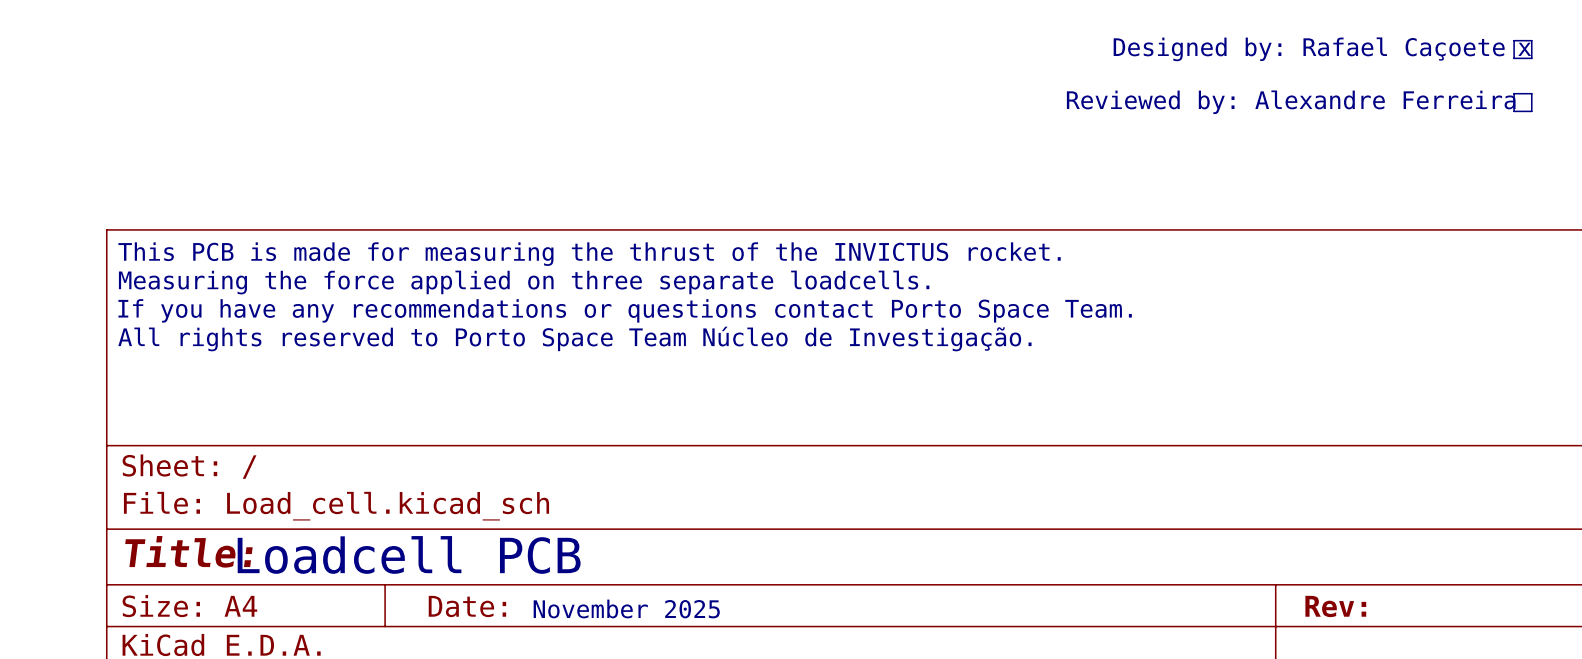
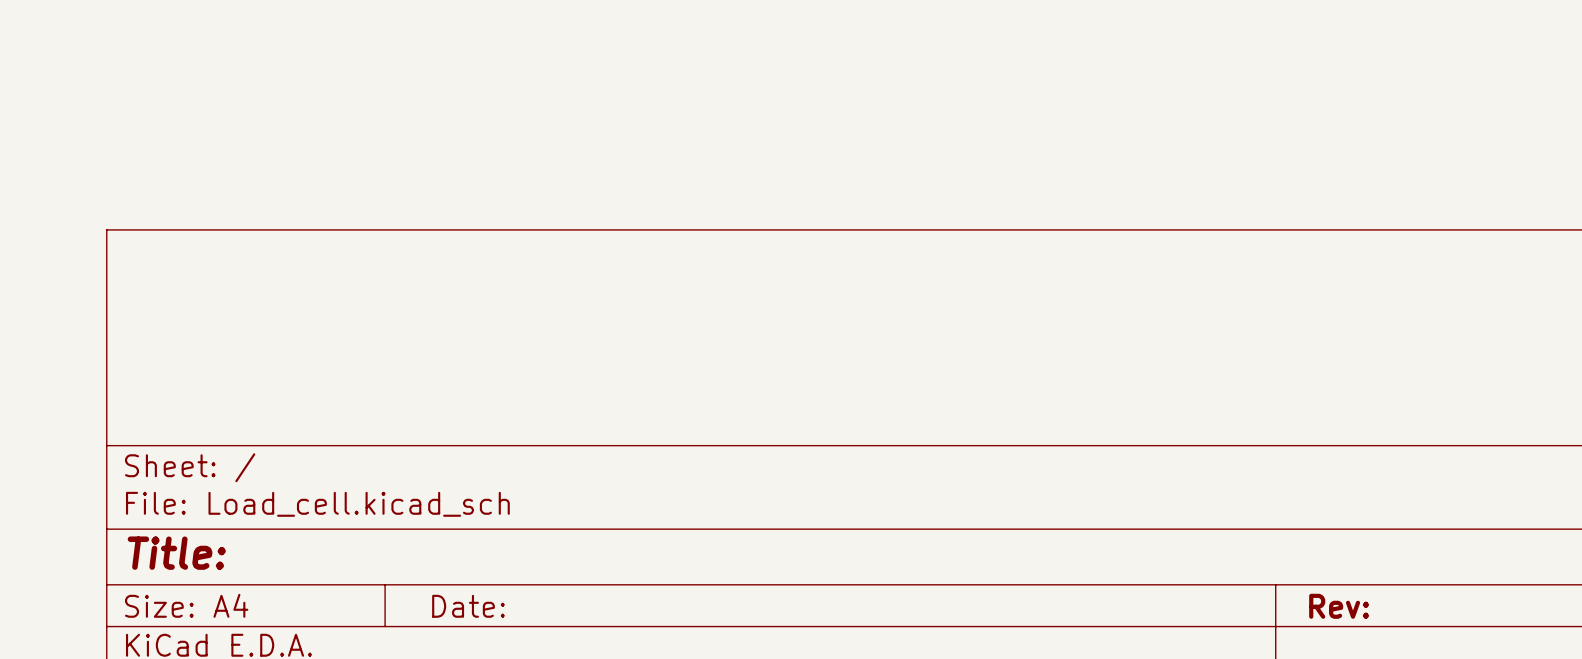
bus: (1514, 40) (1531, 40) (1531, 58) (1514, 58) (1514, 40) -> none
text: Designed by: Rafael Caçoete (1309, 49) -> none
text: x (1524, 49) -> none
bus: (1514, 93) (1514, 111) (1531, 111) (1531, 93) (1514, 93) -> none
text: Reviewed by: Alexandre Ferreira (1291, 102) -> none
text: This PCB is made for measuring the thrust of the INVICTUS rocket. (589, 254) -> none
text: Measuring the force applied on three separate loadcells. (524, 282) -> none
text: If you have any recommendations or questions contact Porto Space Team. (625, 310) -> none
text: All rights reserved to Porto Space Team Núcleo de Investigação. (574, 339) -> none
text: Loadcell PCB (409, 554) -> none
text: November 2025 (626, 608) -> none

